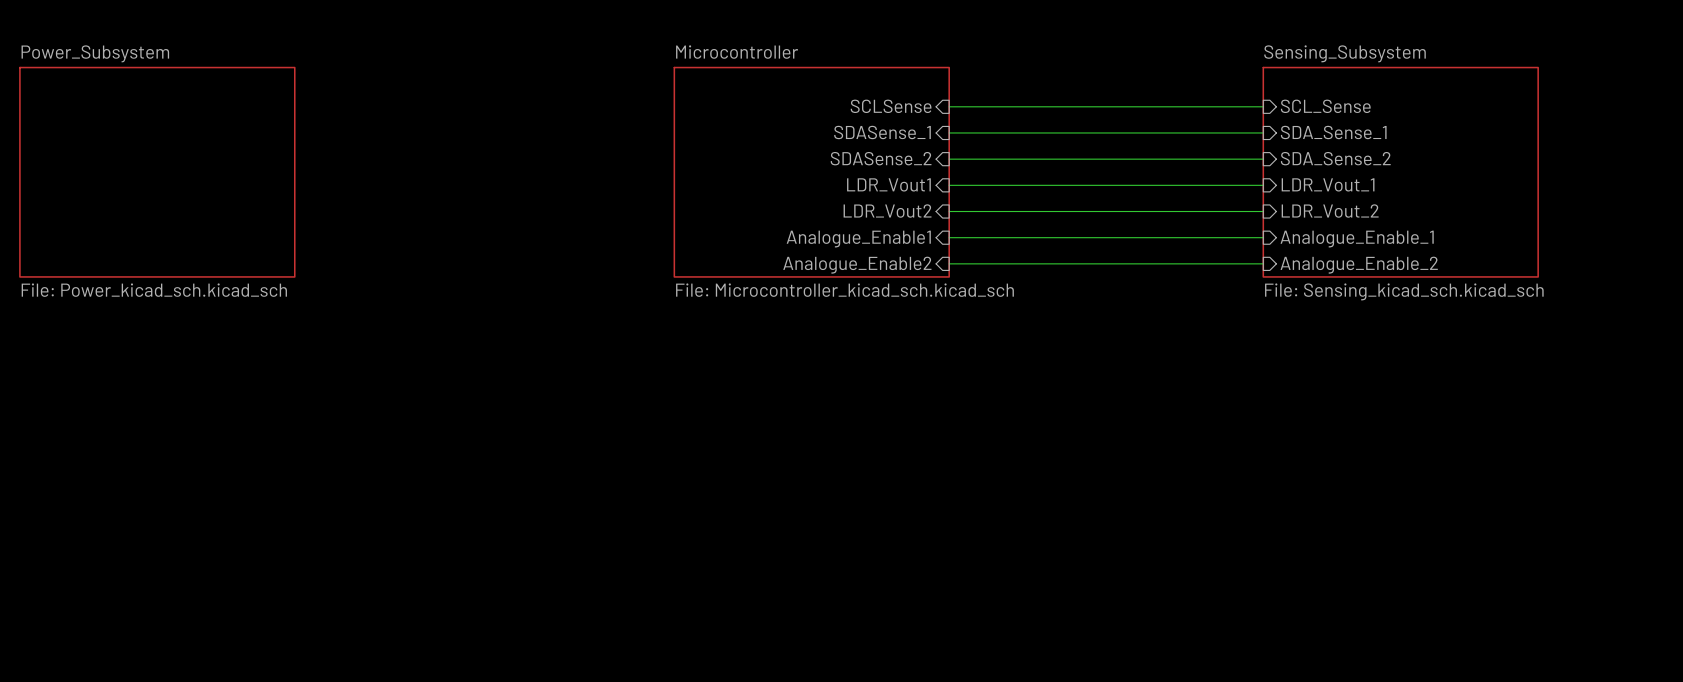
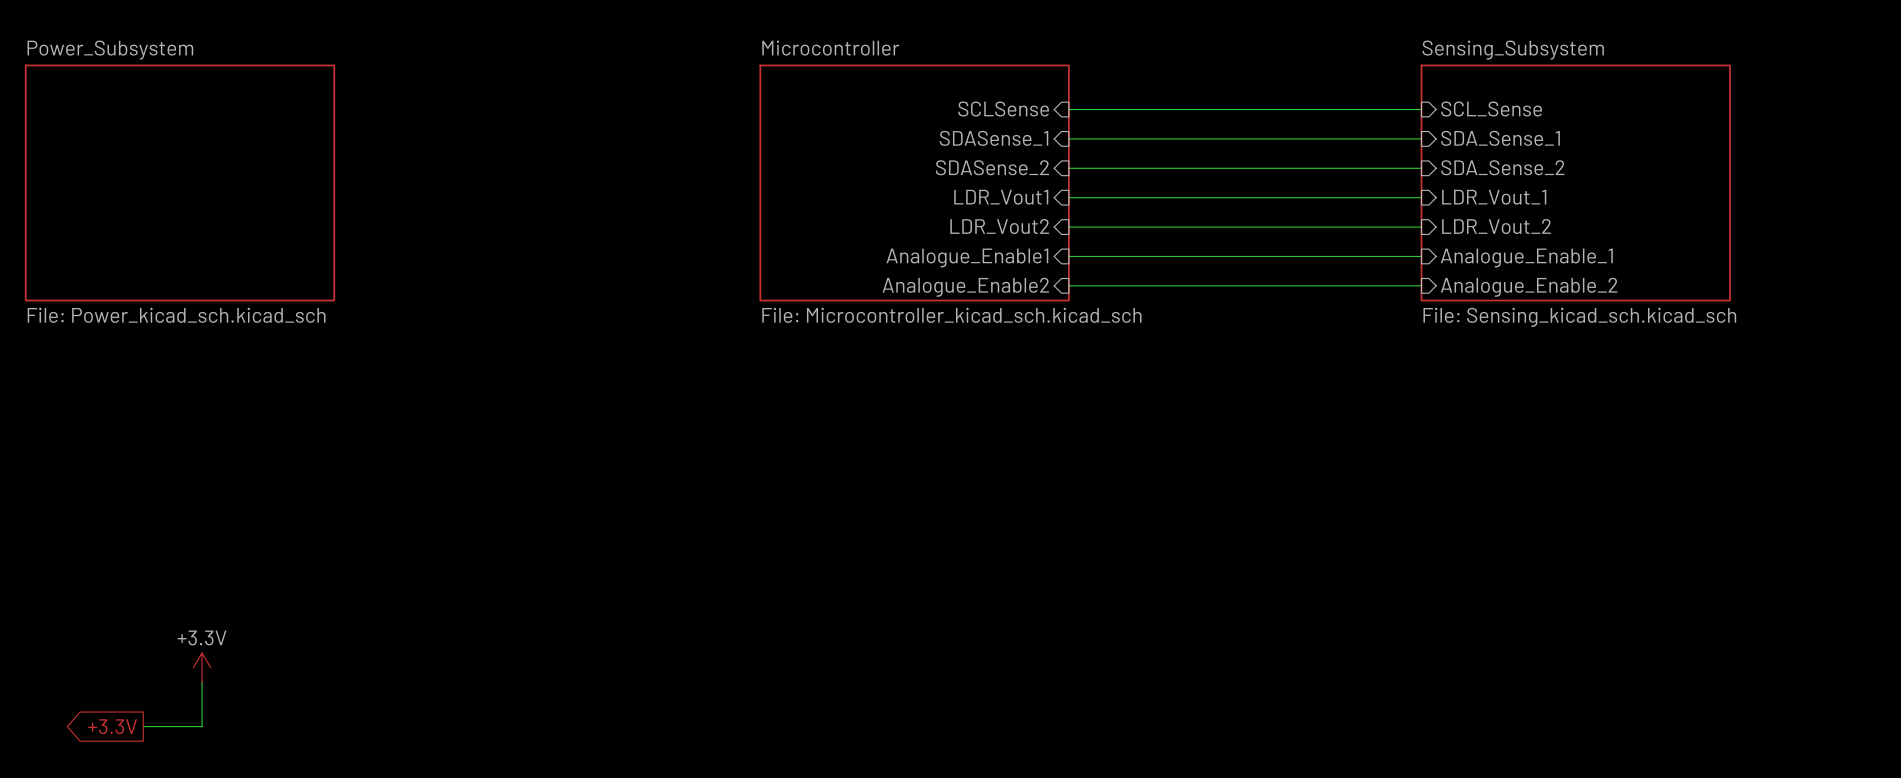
power symbol: none -> +3.3V (202, 667)
wire: none -> (202, 682) (202, 726) (143, 726)
global label: none -> +3.3V (112, 726)

